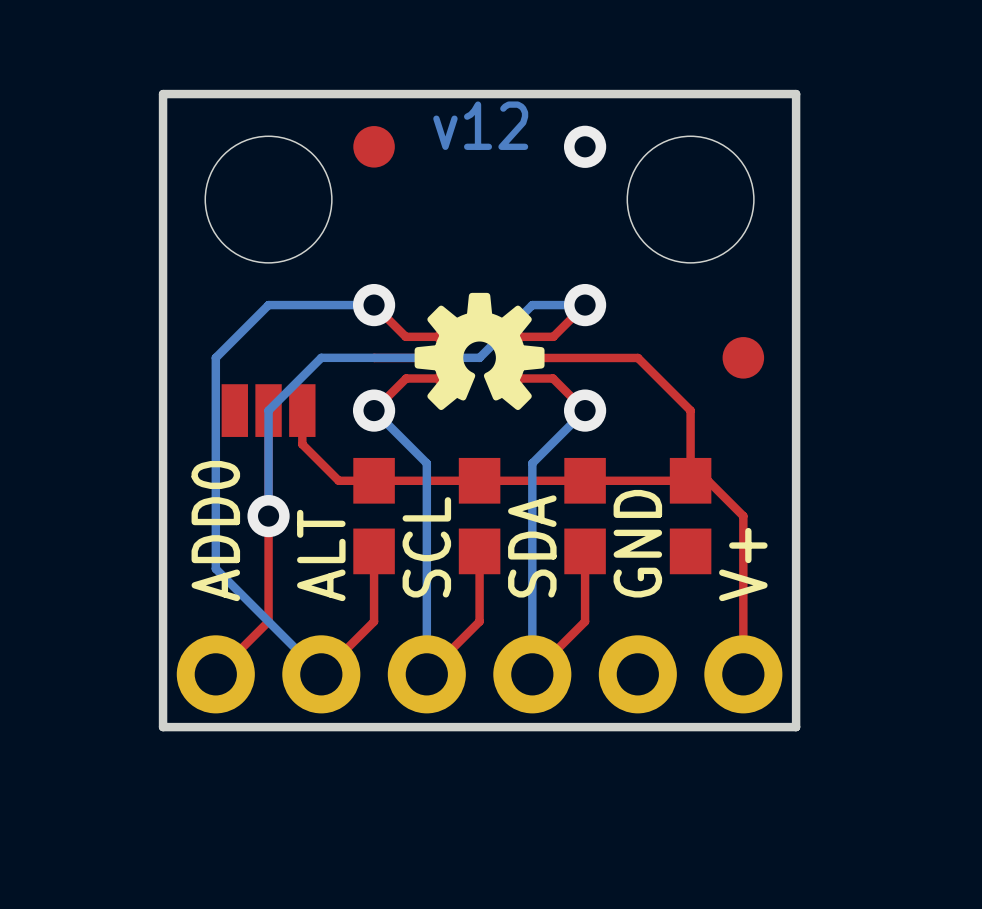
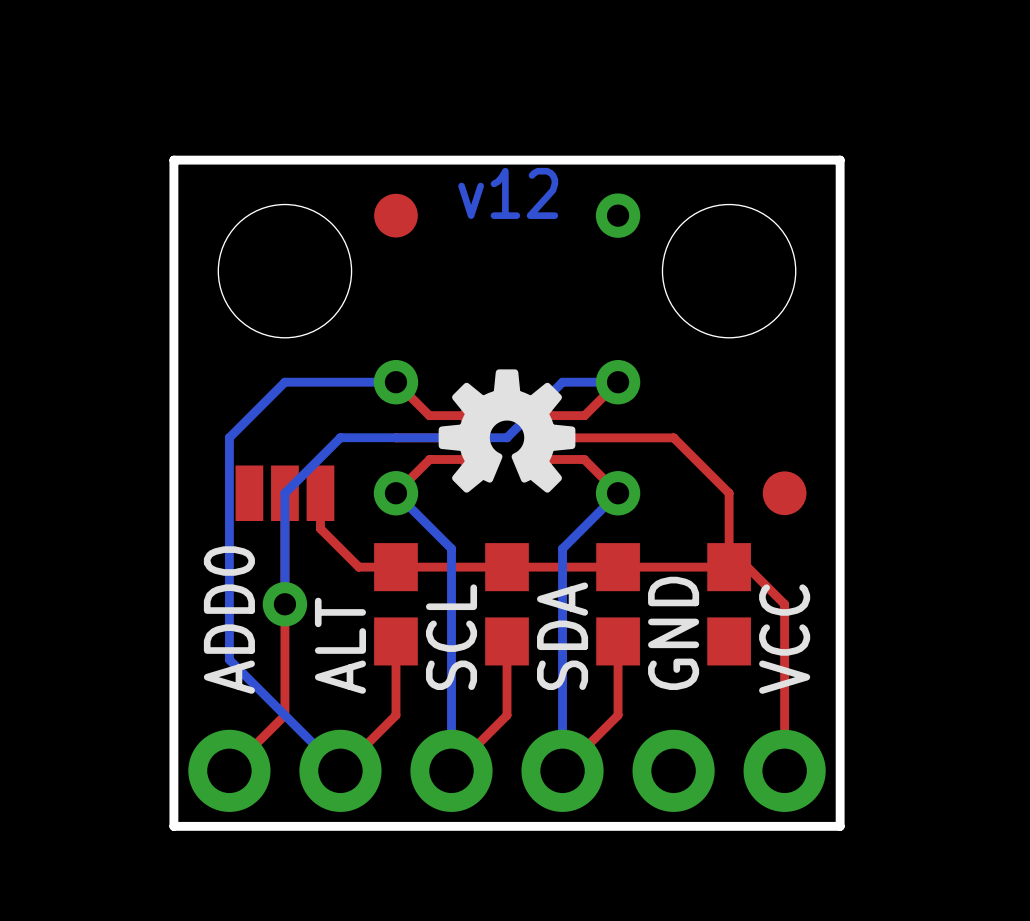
part position: (743, 357) -> (784, 493)
text: V+ (743, 564) -> VCC (784, 639)

